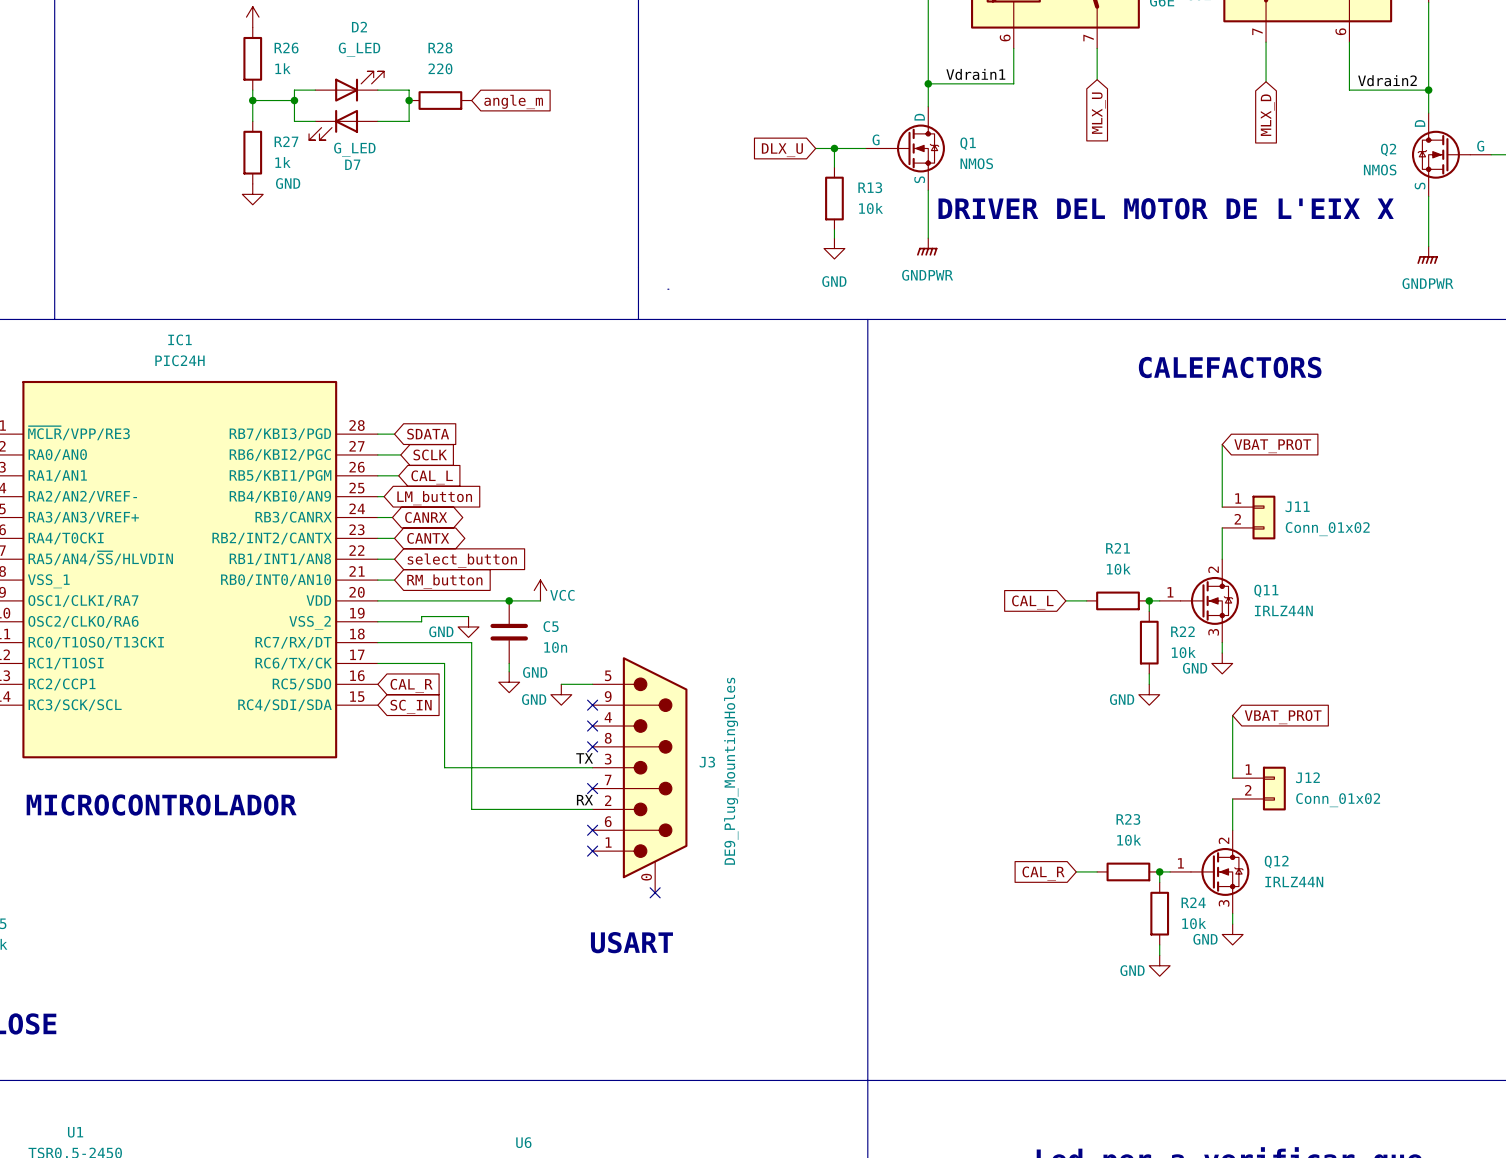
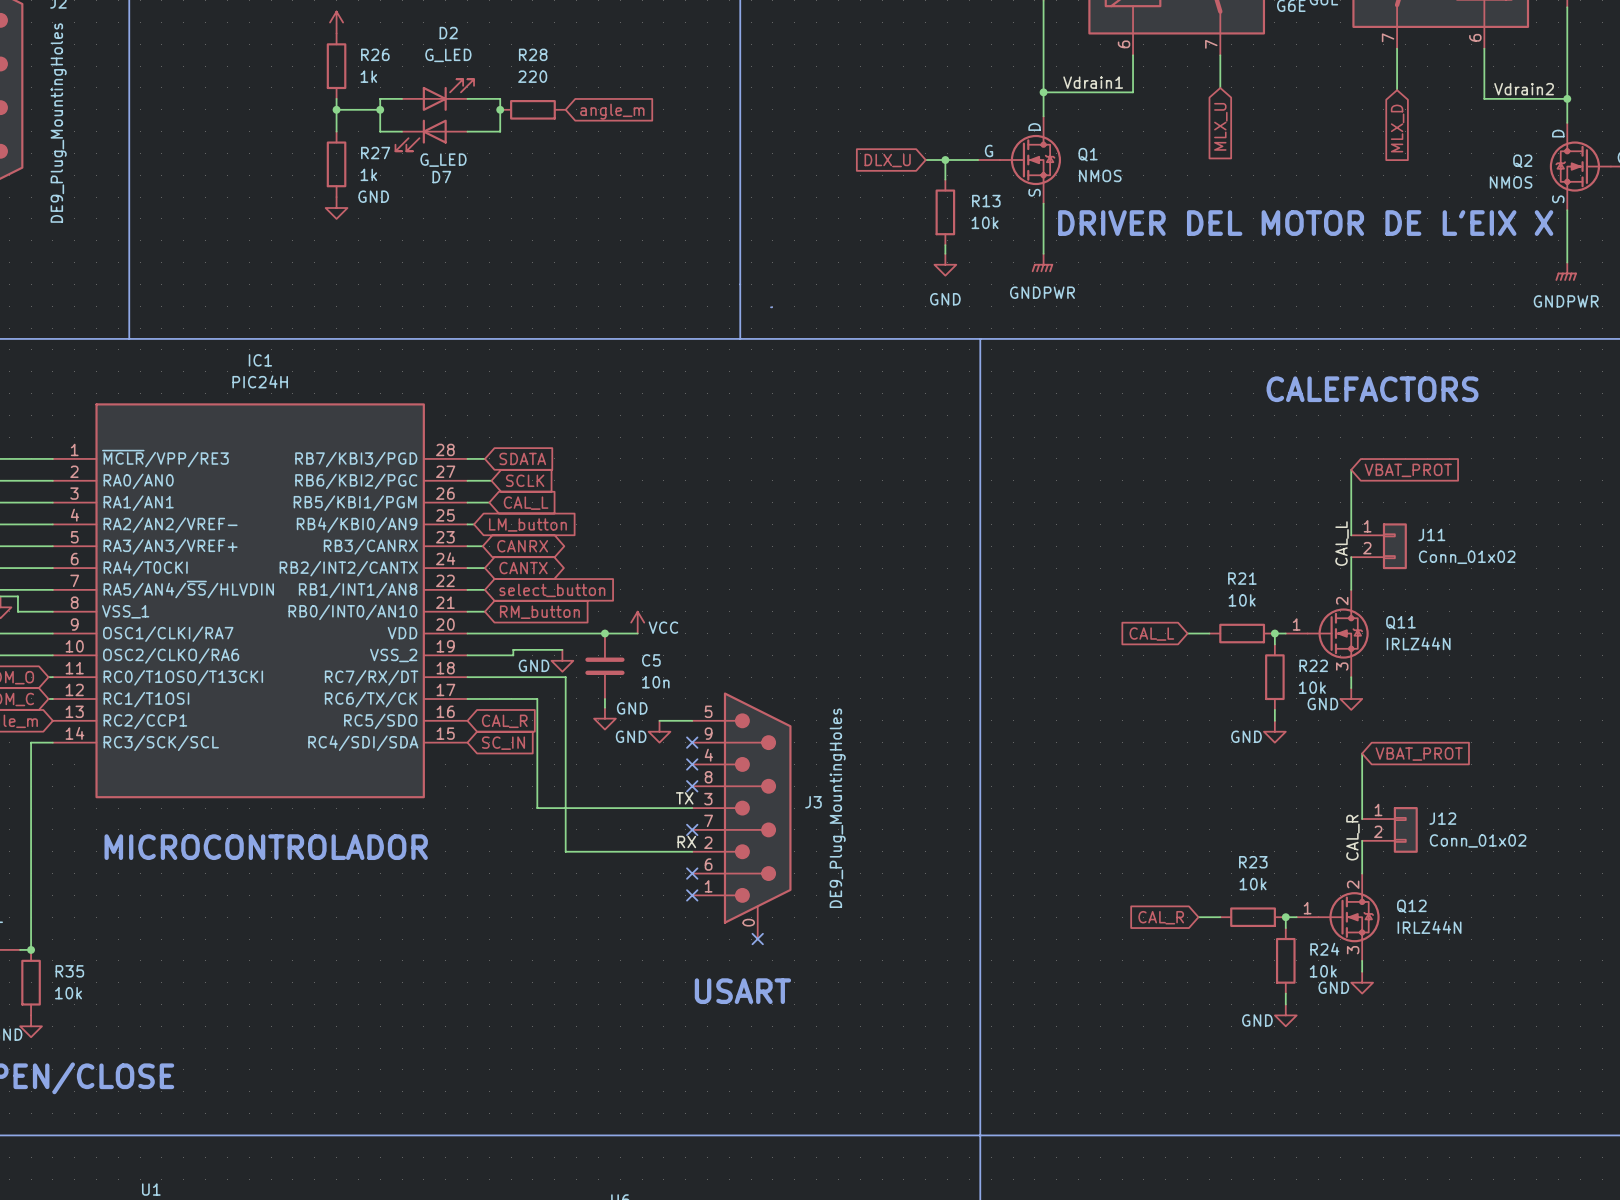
IC1 pin number: 24 (357, 508) -> 23 (445, 537)
label: none -> CAL_L (1342, 543)
IC1 pin number: 23 (356, 529) -> 24 (445, 558)
label: none -> CAL_R (1352, 837)

